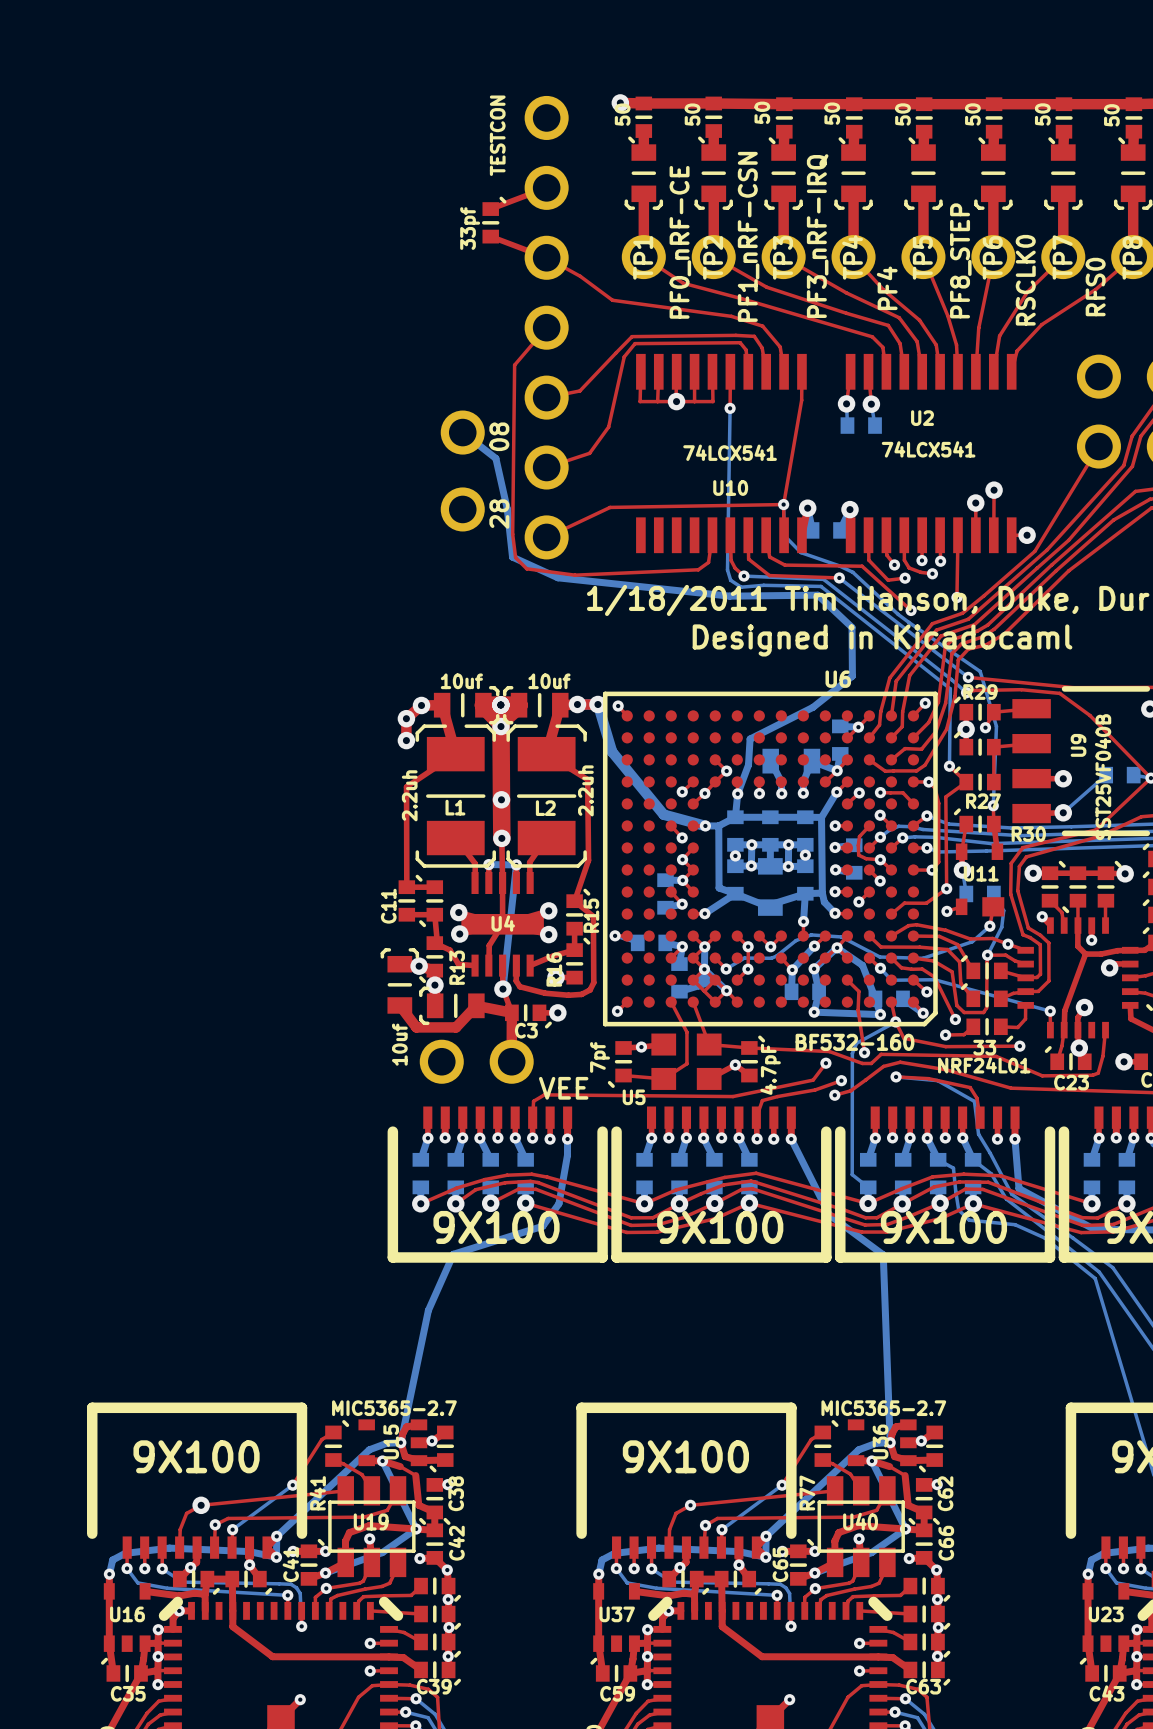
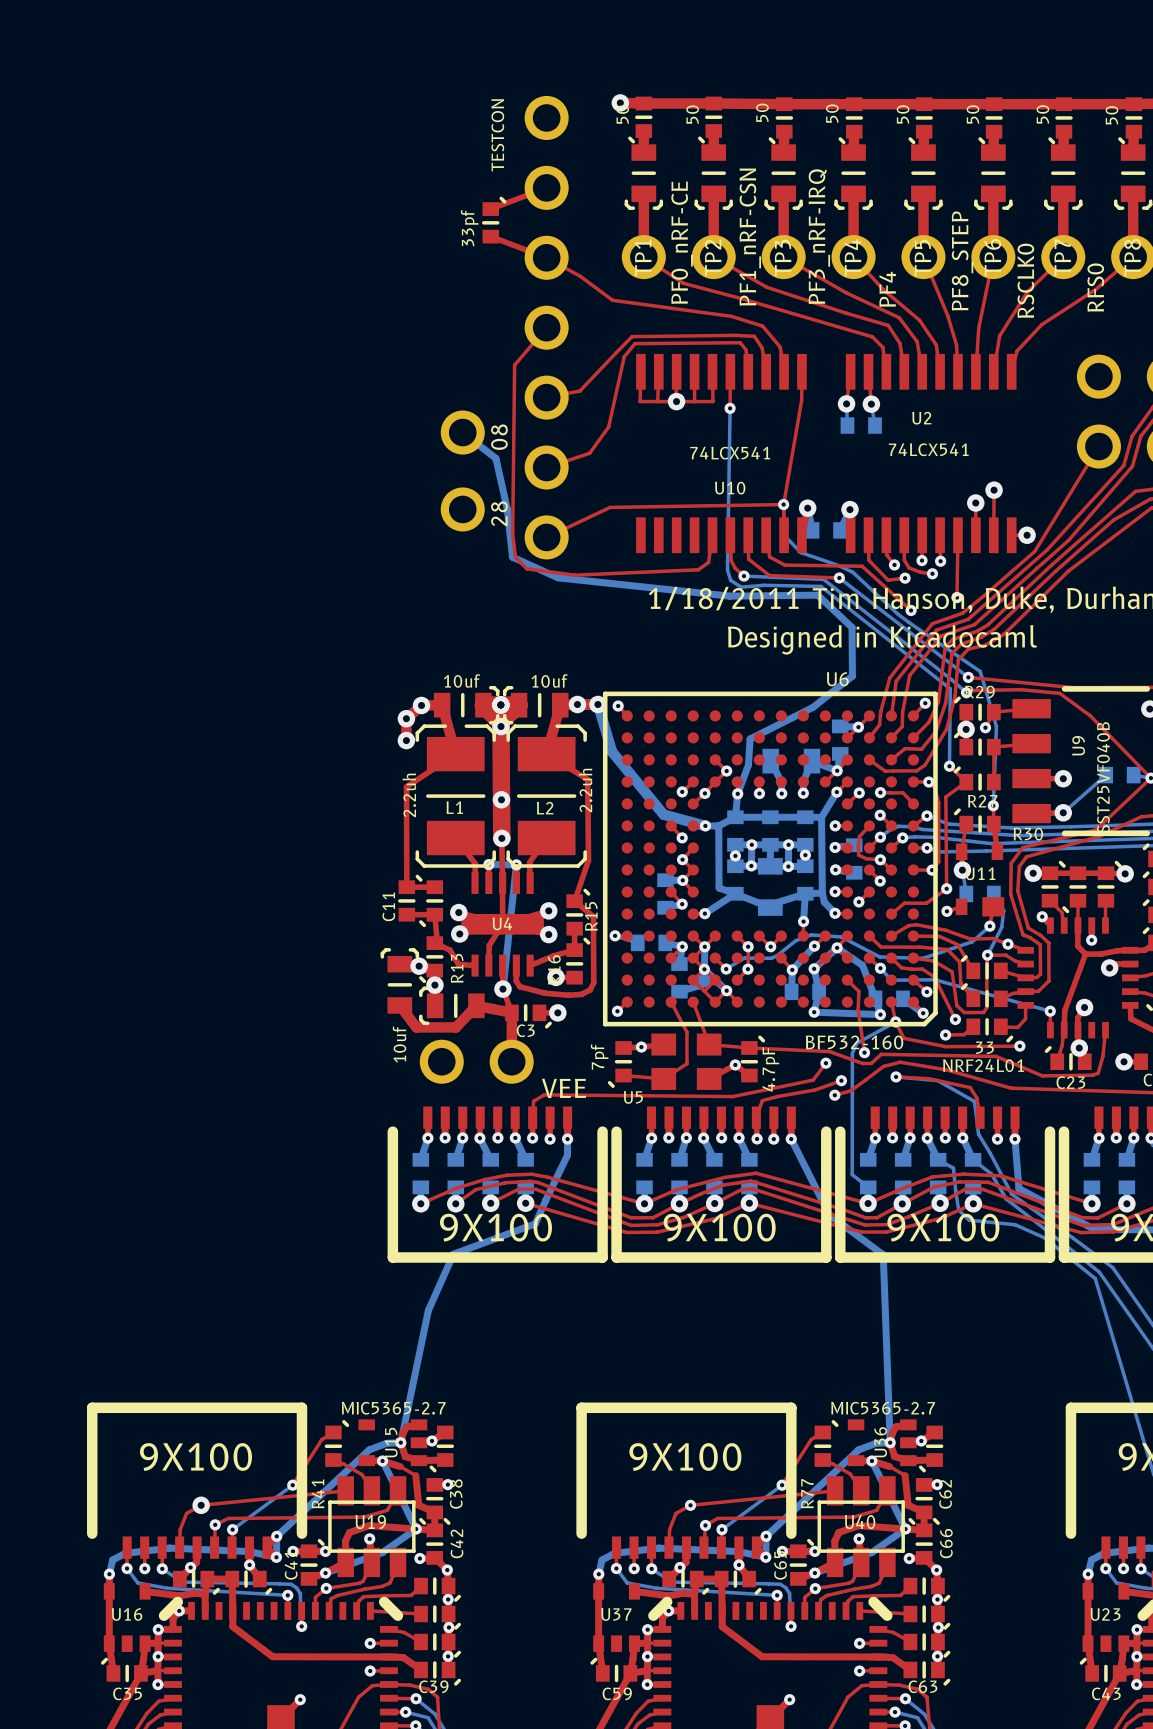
bottom track: (567, 1155) (558, 1203) (542, 1226) (453, 1254) -> (567, 1155) (535, 1223) (453, 1254)

